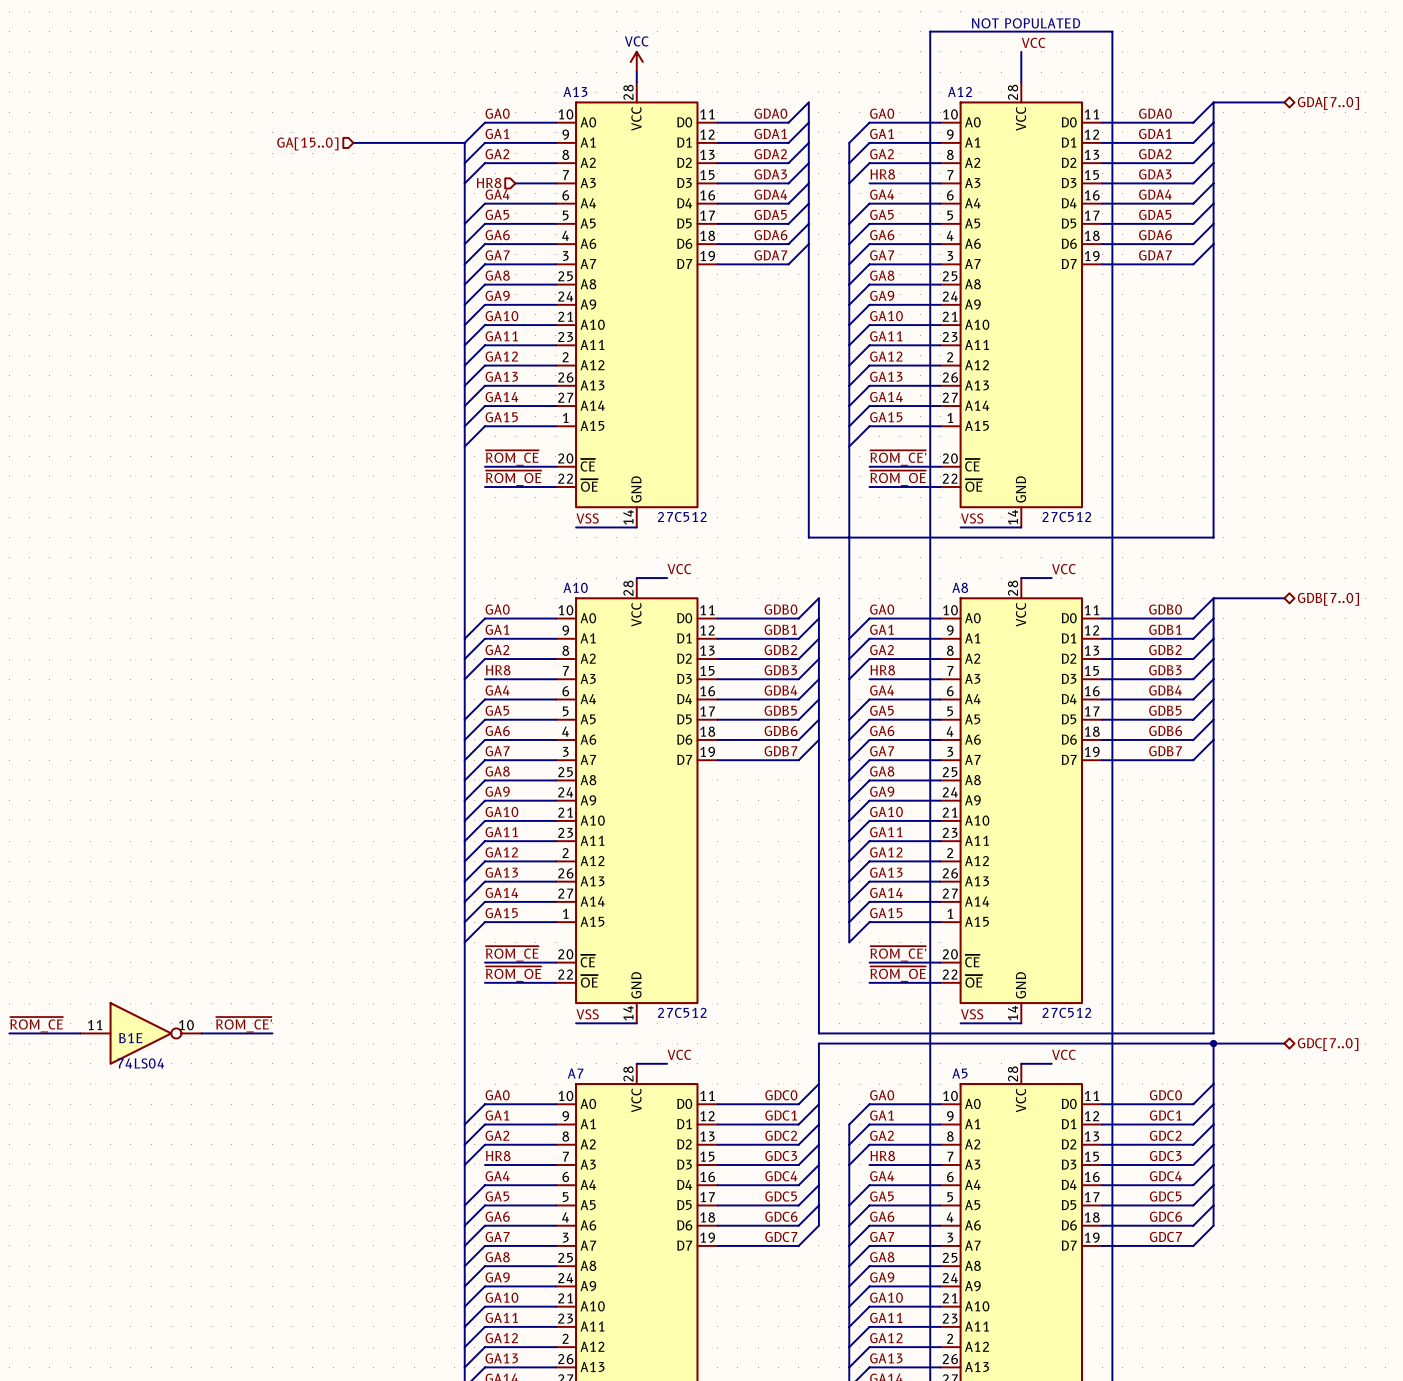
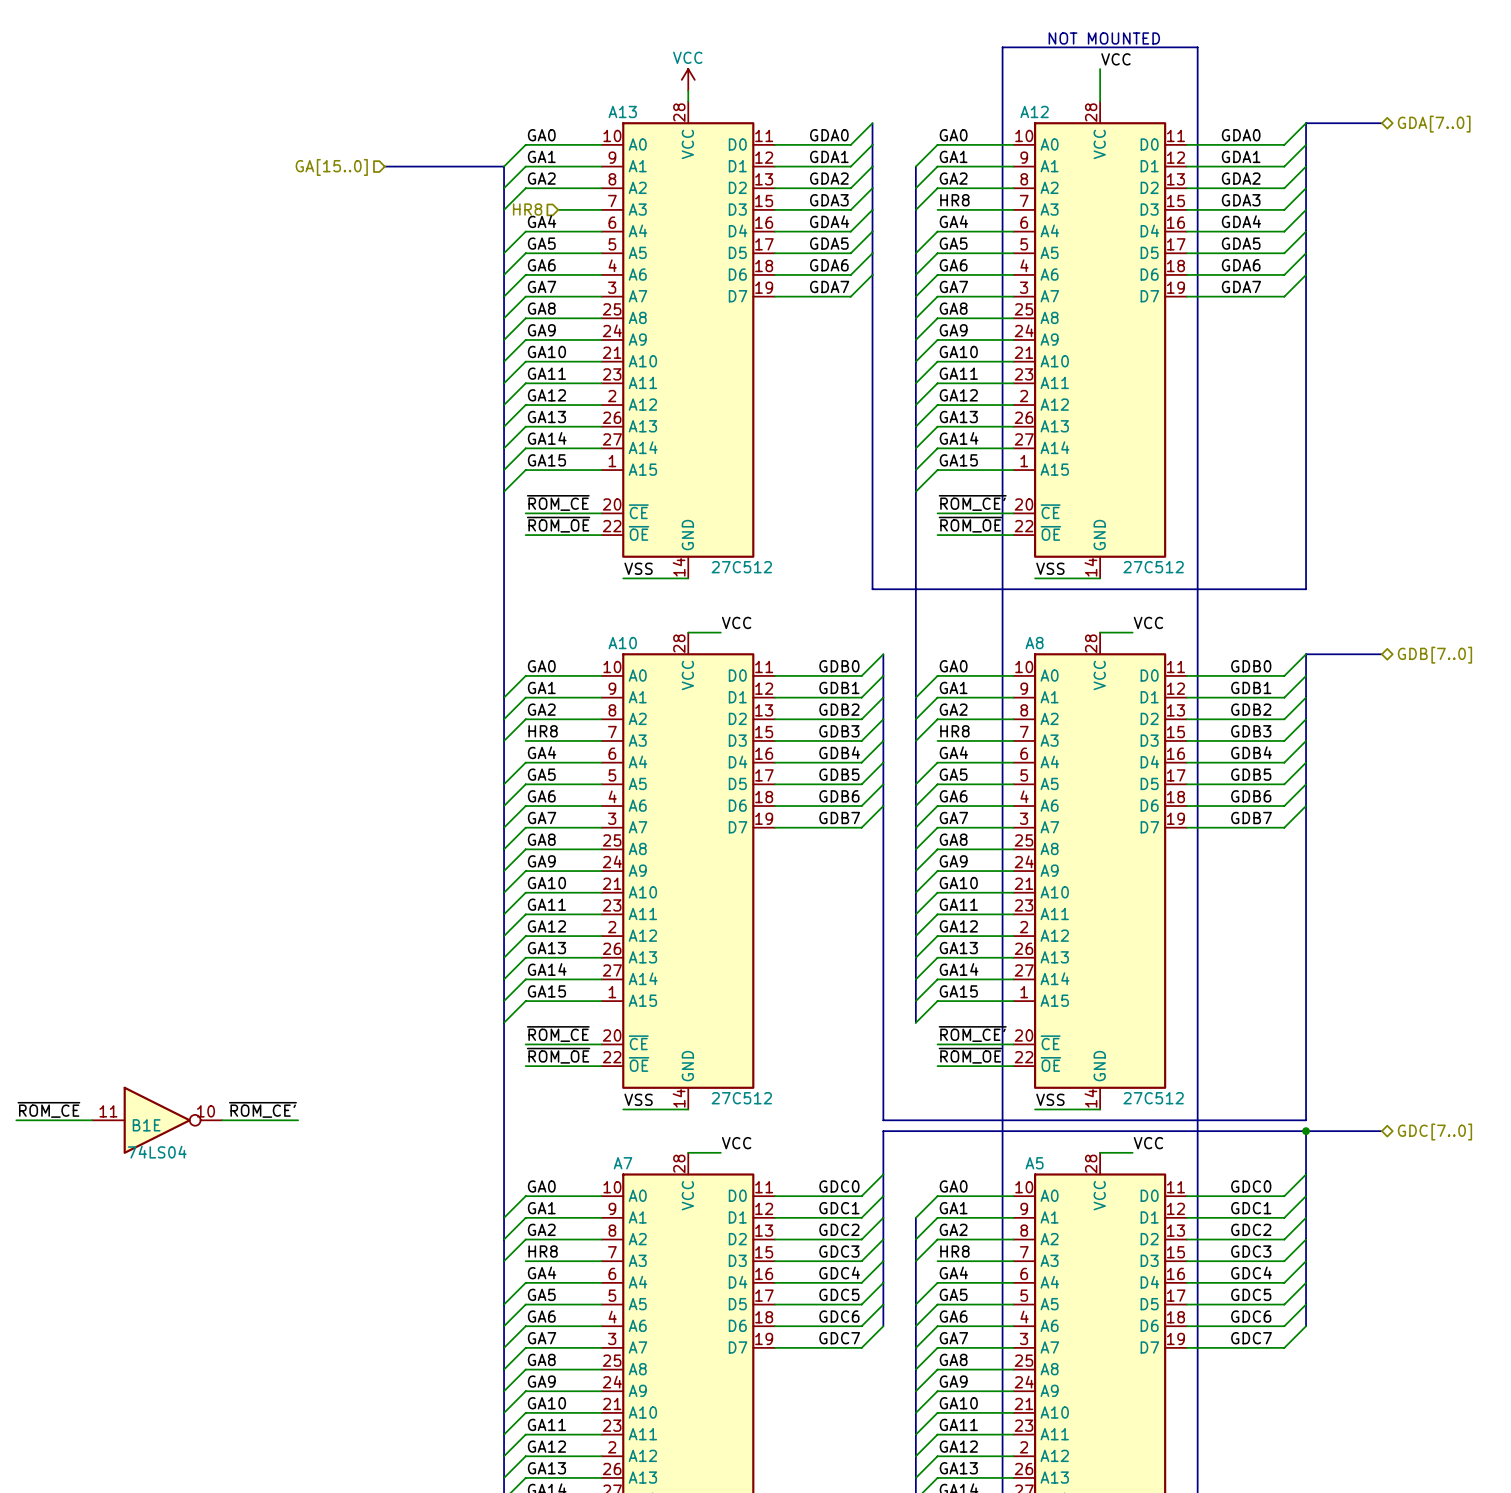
text: NOT POPULATED (1025, 23) -> NOT MOUNTED (1104, 38)

